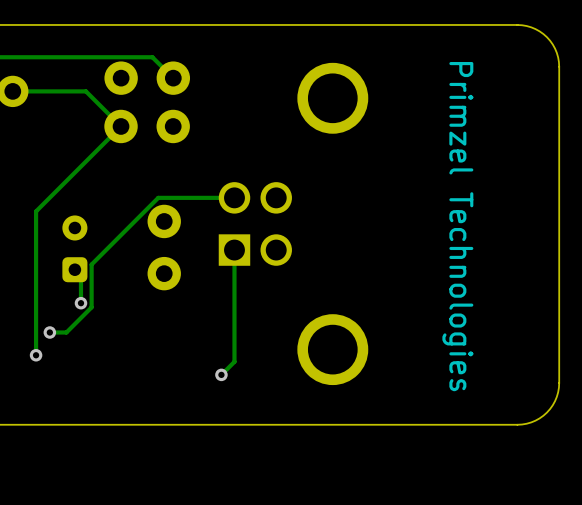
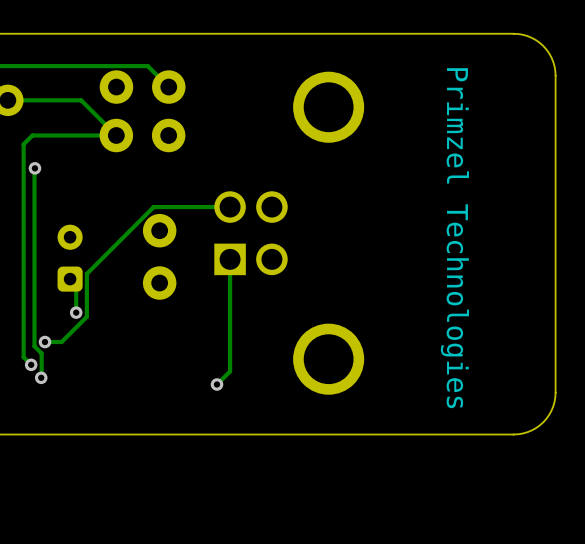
track: (121, 126) (36, 211) (36, 355) -> (116, 135) (32, 135) (23, 144) (23, 357) (31, 364)
track: none -> (34, 168) (34, 346) (41, 353) (41, 377)
via: none -> (34, 168)
via: none -> (41, 377)

